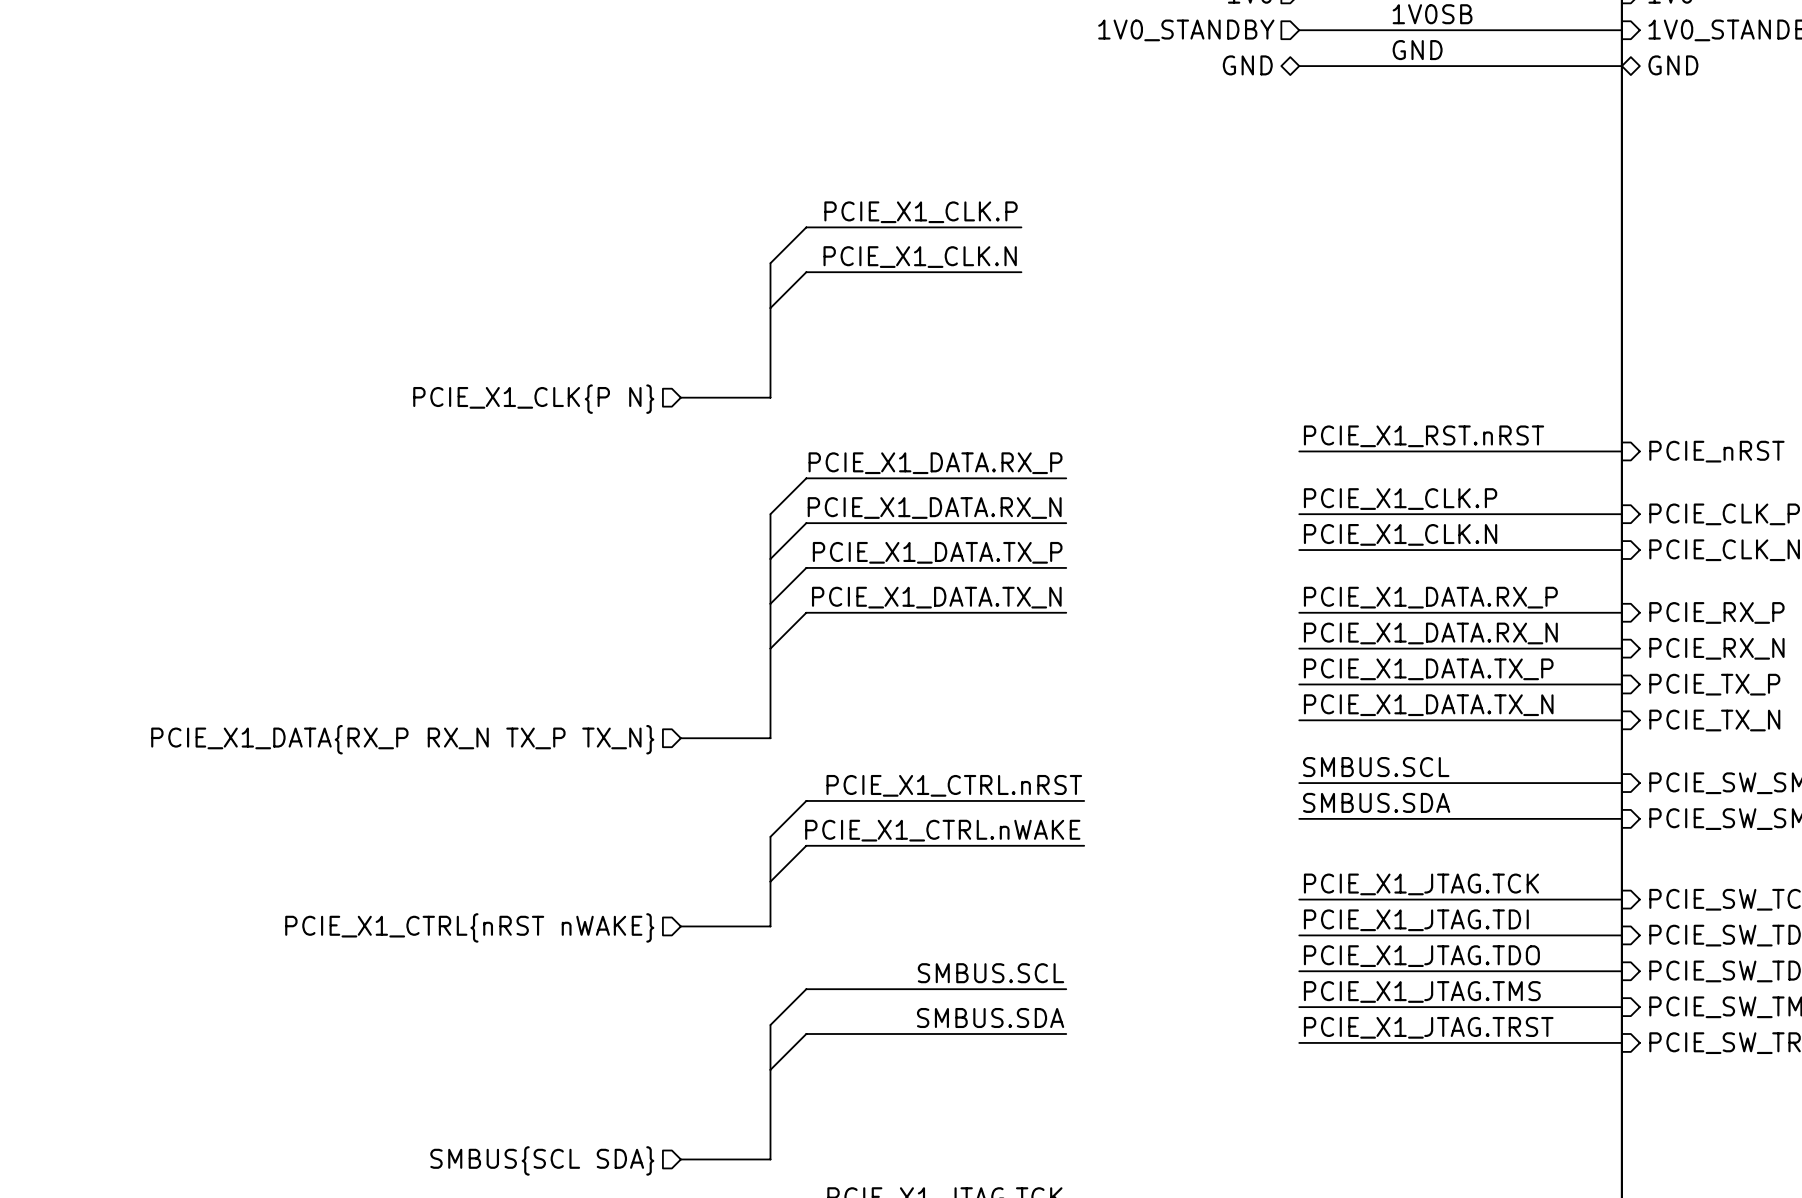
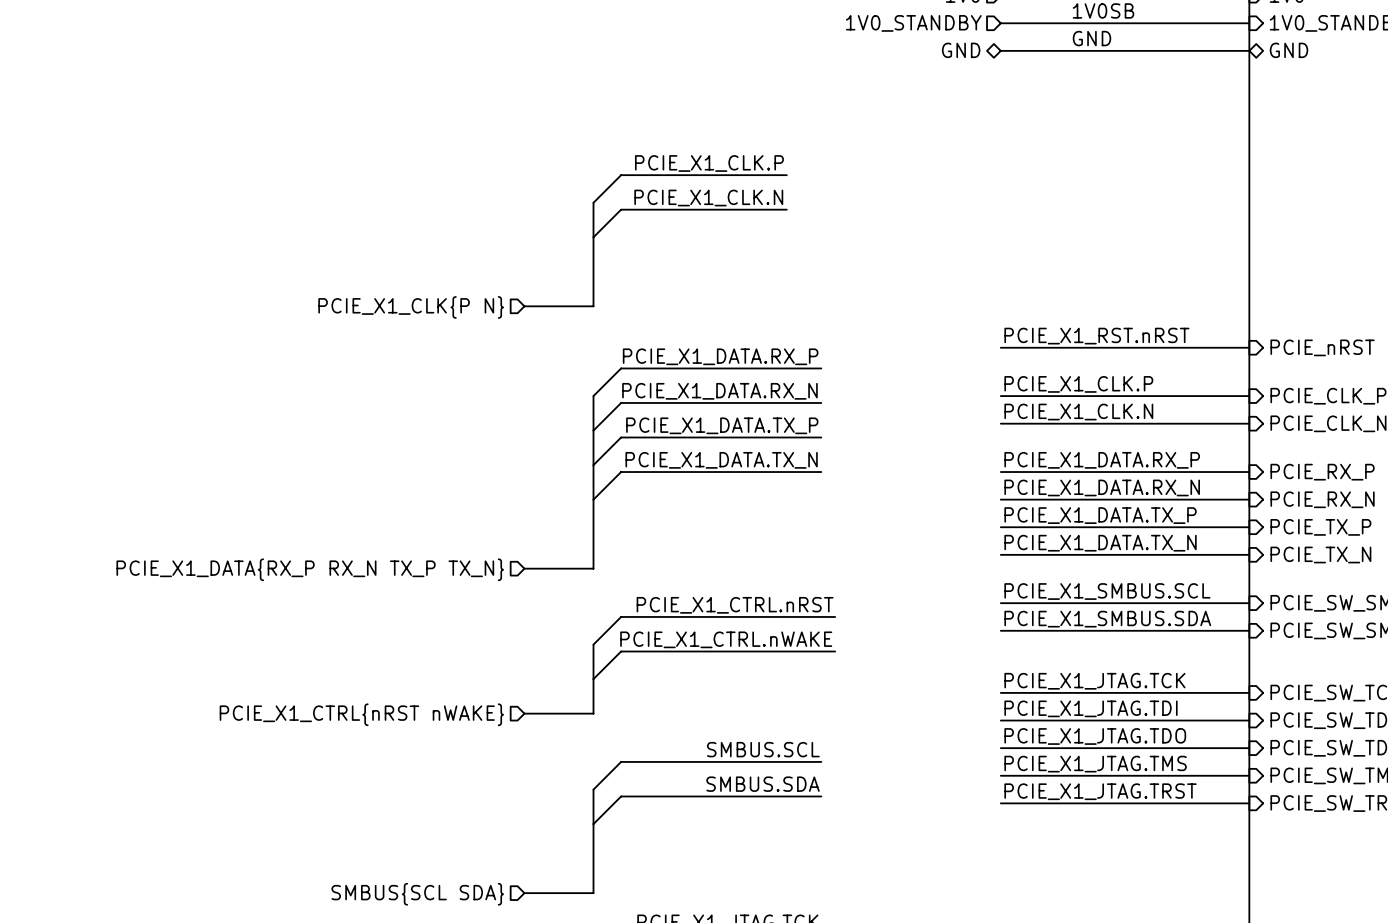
label: SMBUS.SCL (1376, 767) -> PCIE_X1_SMBUS.SCL (1107, 591)
label: SMBUS.SDA (1376, 802) -> PCIE_X1_SMBUS.SDA (1107, 619)

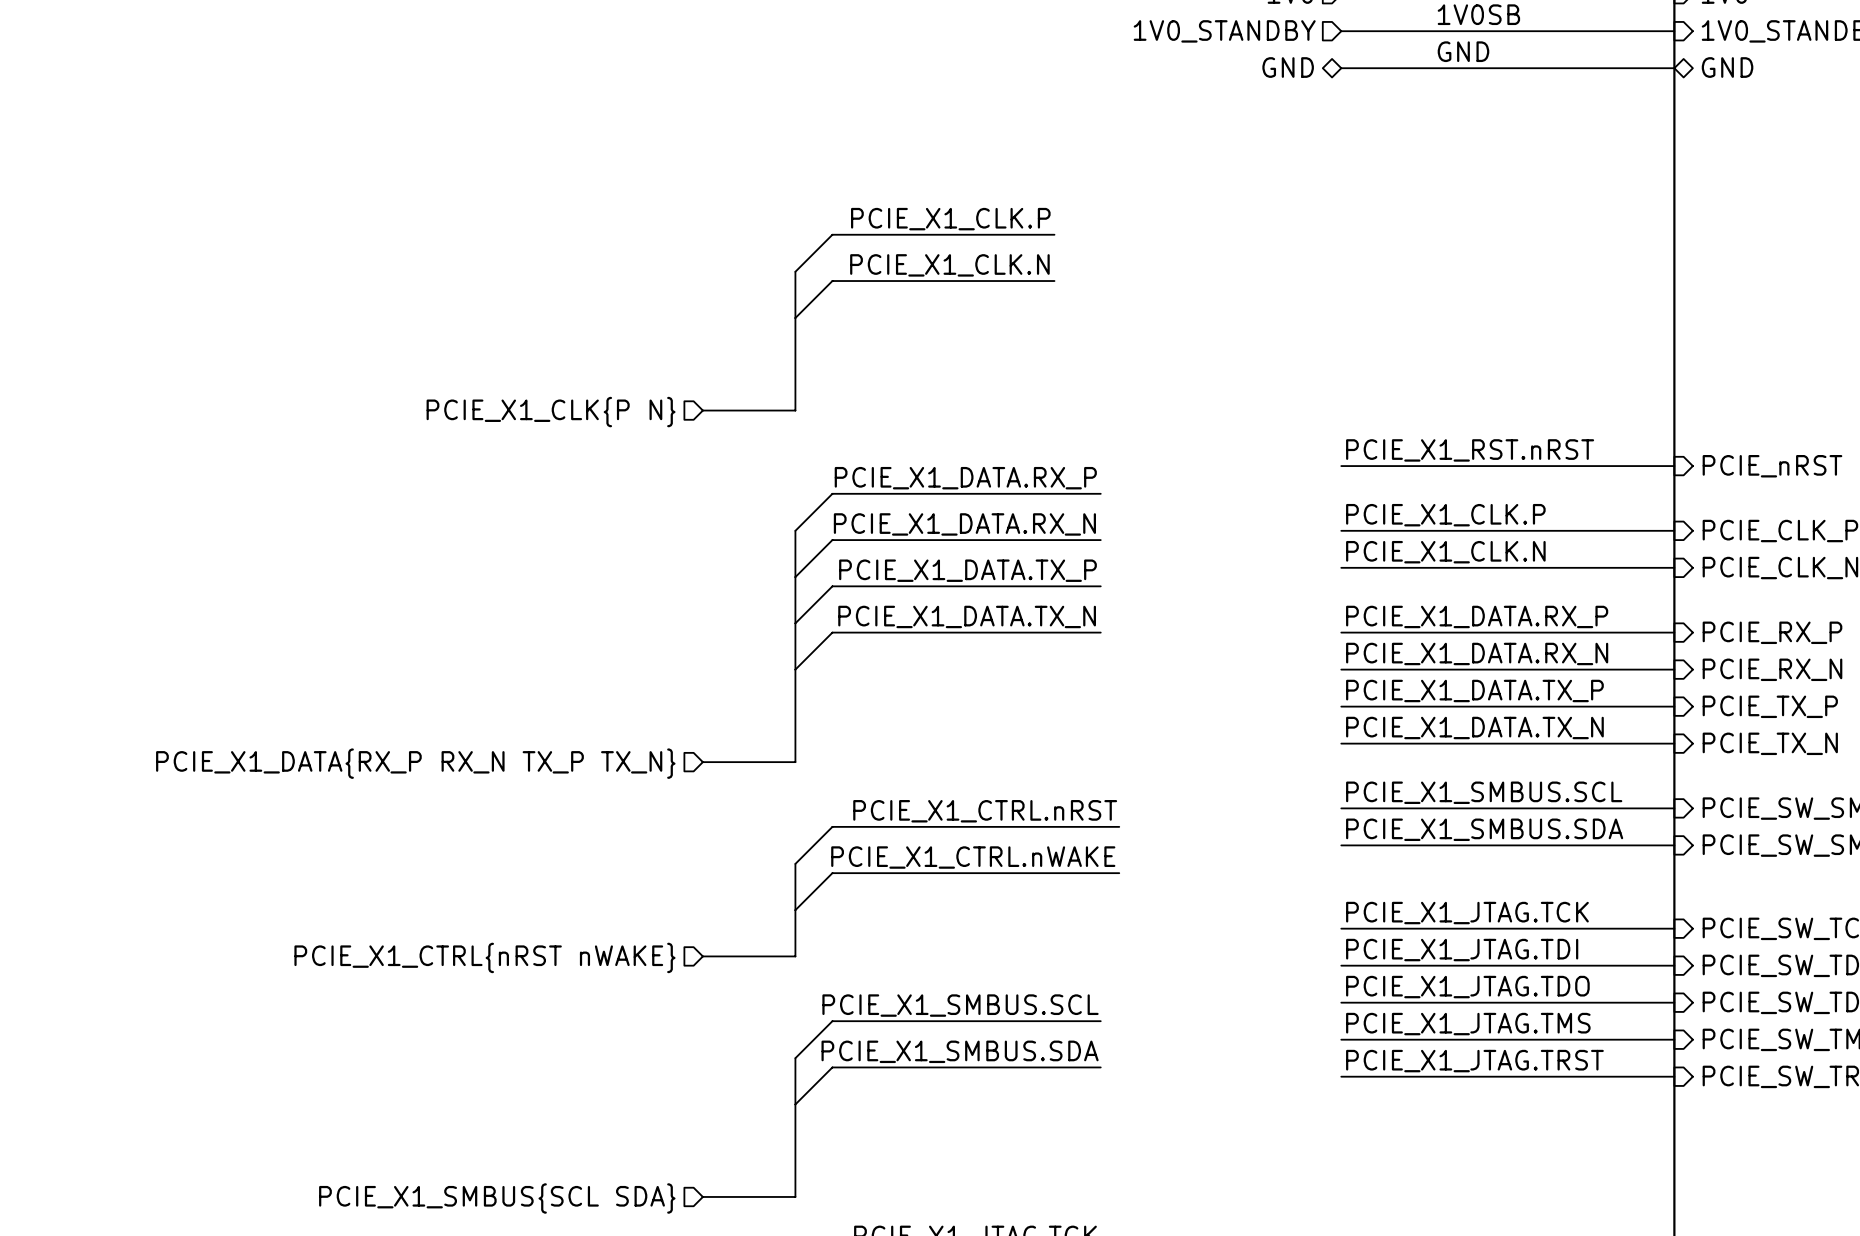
label: SMBUS.SCL (763, 749) -> PCIE_X1_SMBUS.SCL (960, 1005)
label: SMBUS.SDA (763, 784) -> PCIE_X1_SMBUS.SDA (960, 1051)
hierarchical label: SMBUS{SCL SDA} (417, 894) -> PCIE_X1_SMBUS{SCL SDA} (497, 1198)

